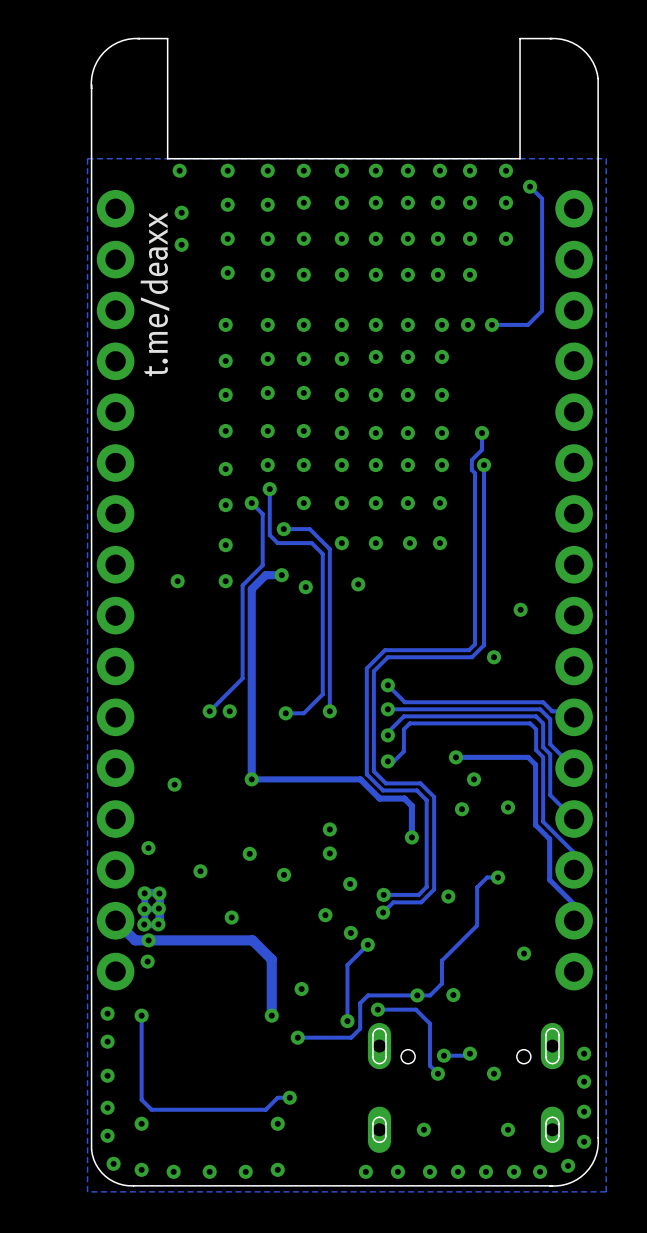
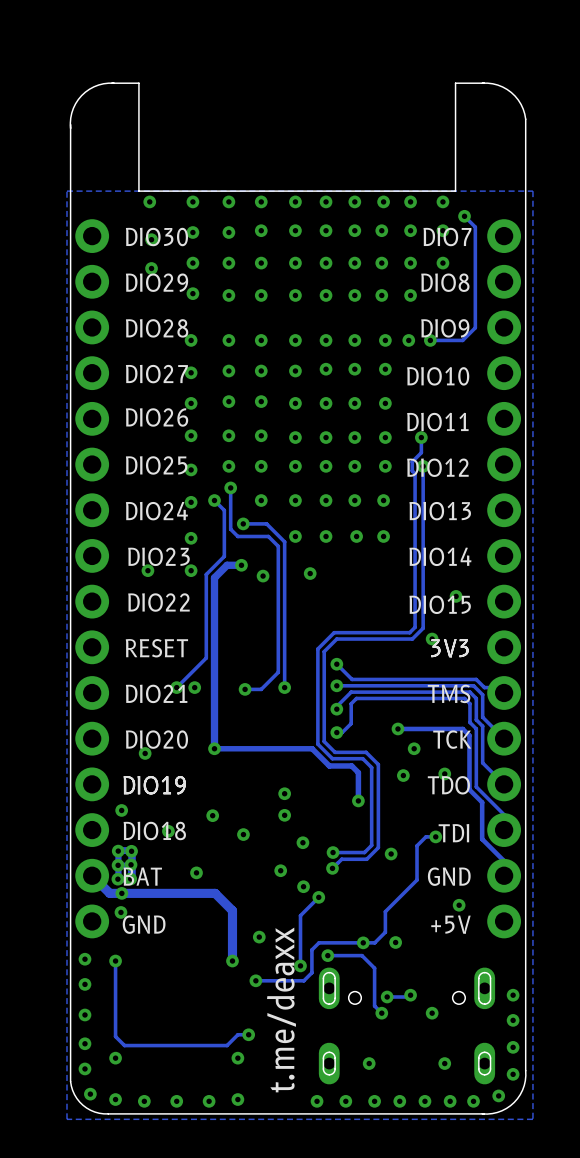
text: none -> DIO30 (156, 236)
text: none -> DIO7 (447, 236)
text: none -> DIO29 (157, 282)
text: none -> DIO8 (445, 282)
text: t.me/deaxx (154, 294) -> DIO27 (156, 374)
text: none -> DIO28 (157, 328)
text: none -> DIO9 (445, 328)
text: none -> DIO10 (438, 376)
text: none -> DIO26 (157, 417)
text: none -> DIO11 (437, 422)
text: none -> DIO25 (156, 465)
text: none -> DIO12 (437, 467)
text: none -> DIO24 (156, 511)
text: none -> DIO13 (440, 511)
text: none -> DIO23 (158, 556)
text: none -> DIO14 (440, 556)
text: none -> DIO22 (158, 602)
text: none -> DIO15 (440, 604)
text: none -> RESET (156, 648)
text: none -> 3V3 (449, 648)
text: none -> DIO21 (156, 693)
text: none -> TMS (449, 693)
text: none -> DIO20 (156, 739)
text: none -> TCK (452, 739)
text: none -> DIO19 (154, 785)
text: none -> TDO (448, 785)
text: none -> DIO18 (154, 830)
text: none -> TDI (453, 833)
text: none -> BAT (142, 876)
text: none -> GND (449, 876)
text: none -> GND (144, 924)
text: none -> +5V (450, 924)
text: none -> t.me/deaxx (281, 1009)

